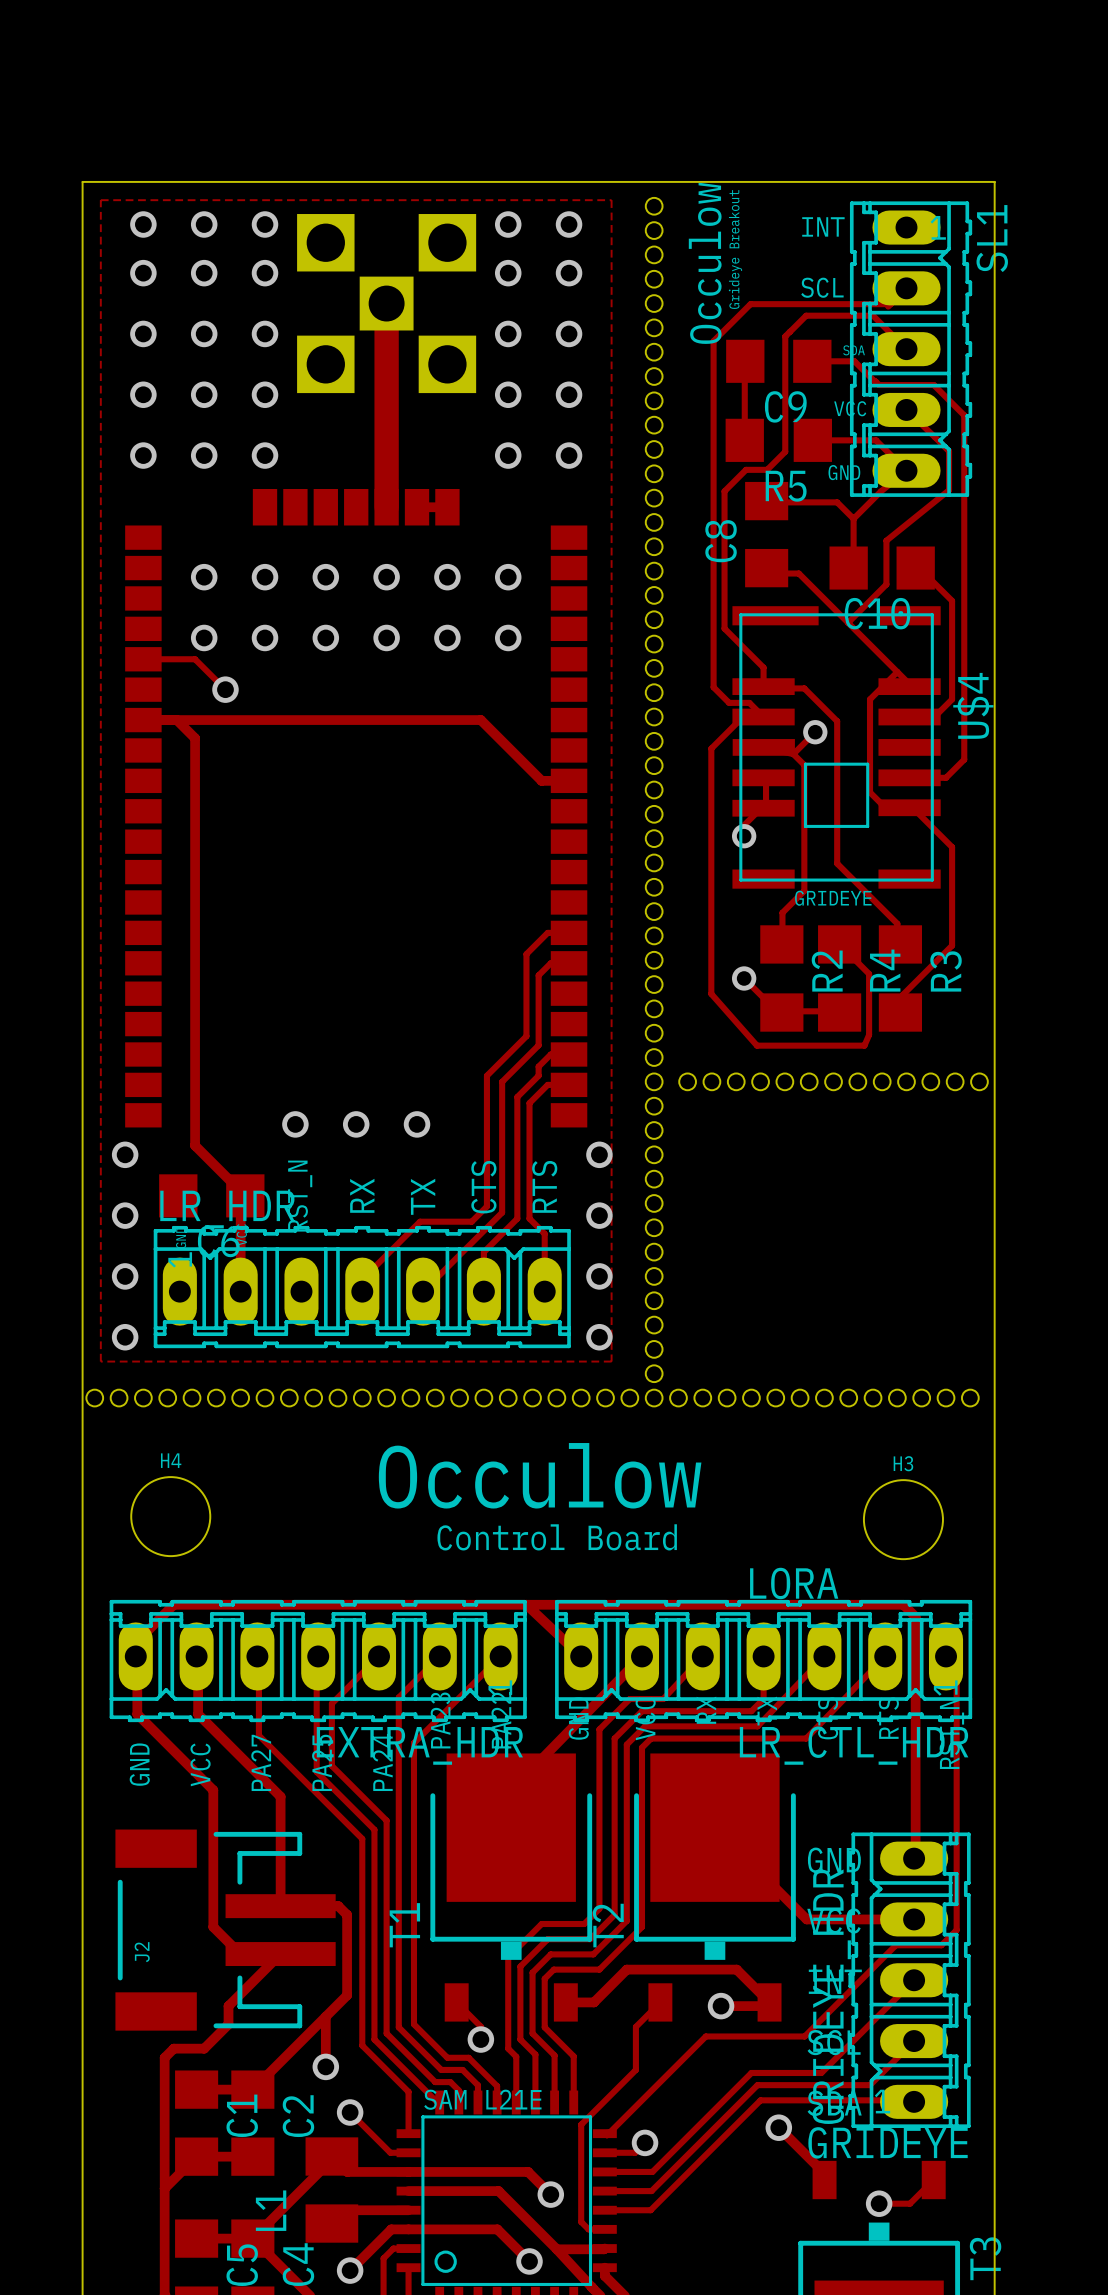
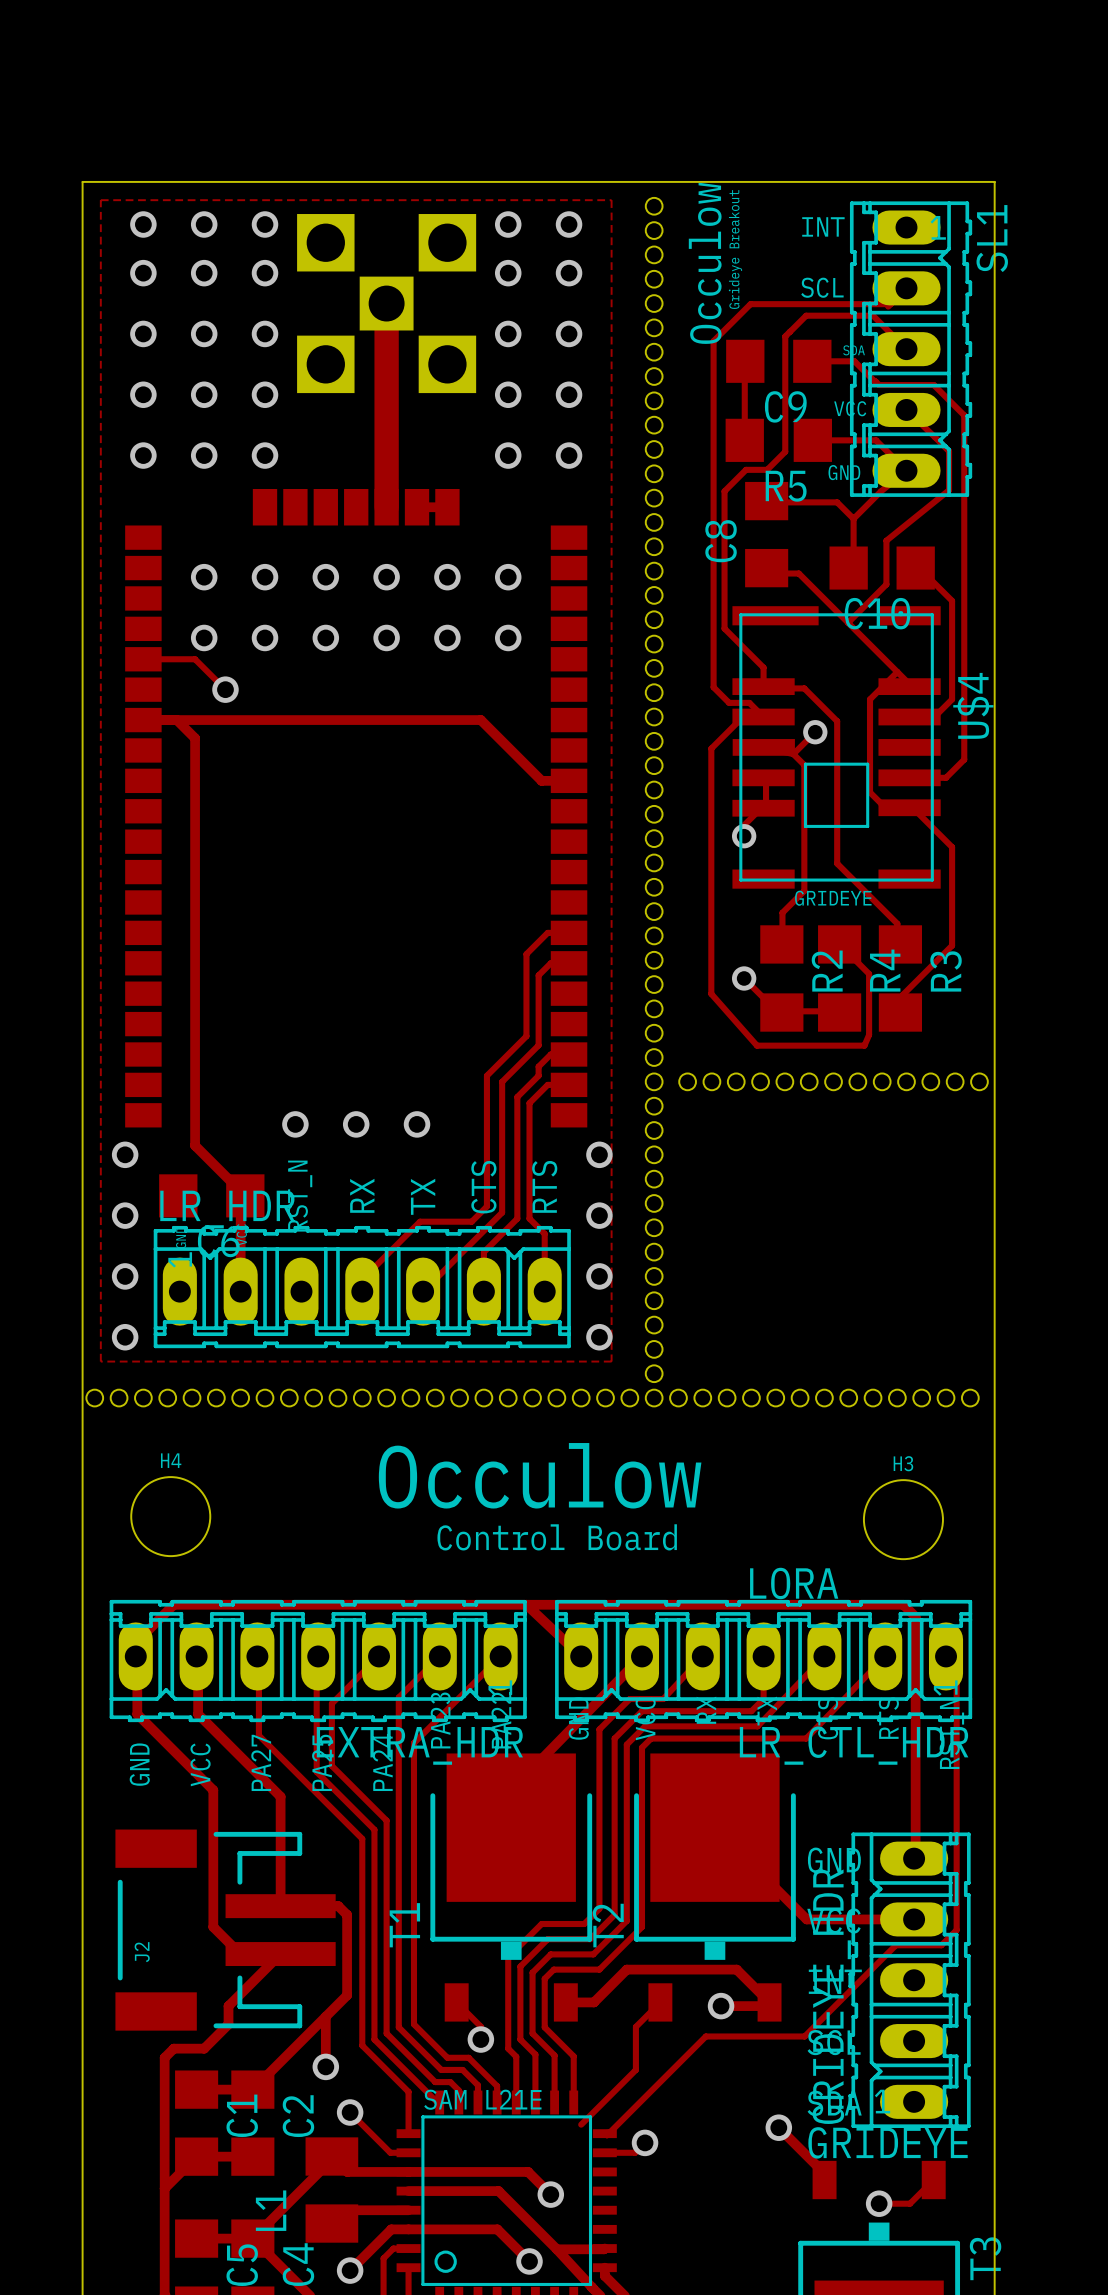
track: (914, 1980) (821, 2072) (751, 2072) (652, 2171) (604, 2171) -> none
track: (914, 2041) (870, 2085) (757, 2085) (651, 2191) (604, 2191) -> none
track: (914, 2101) (912, 2100) (760, 2100) (650, 2210) (604, 2210) -> none
track: (581, 2124) (581, 2221) (588, 2229) (604, 2229) -> none

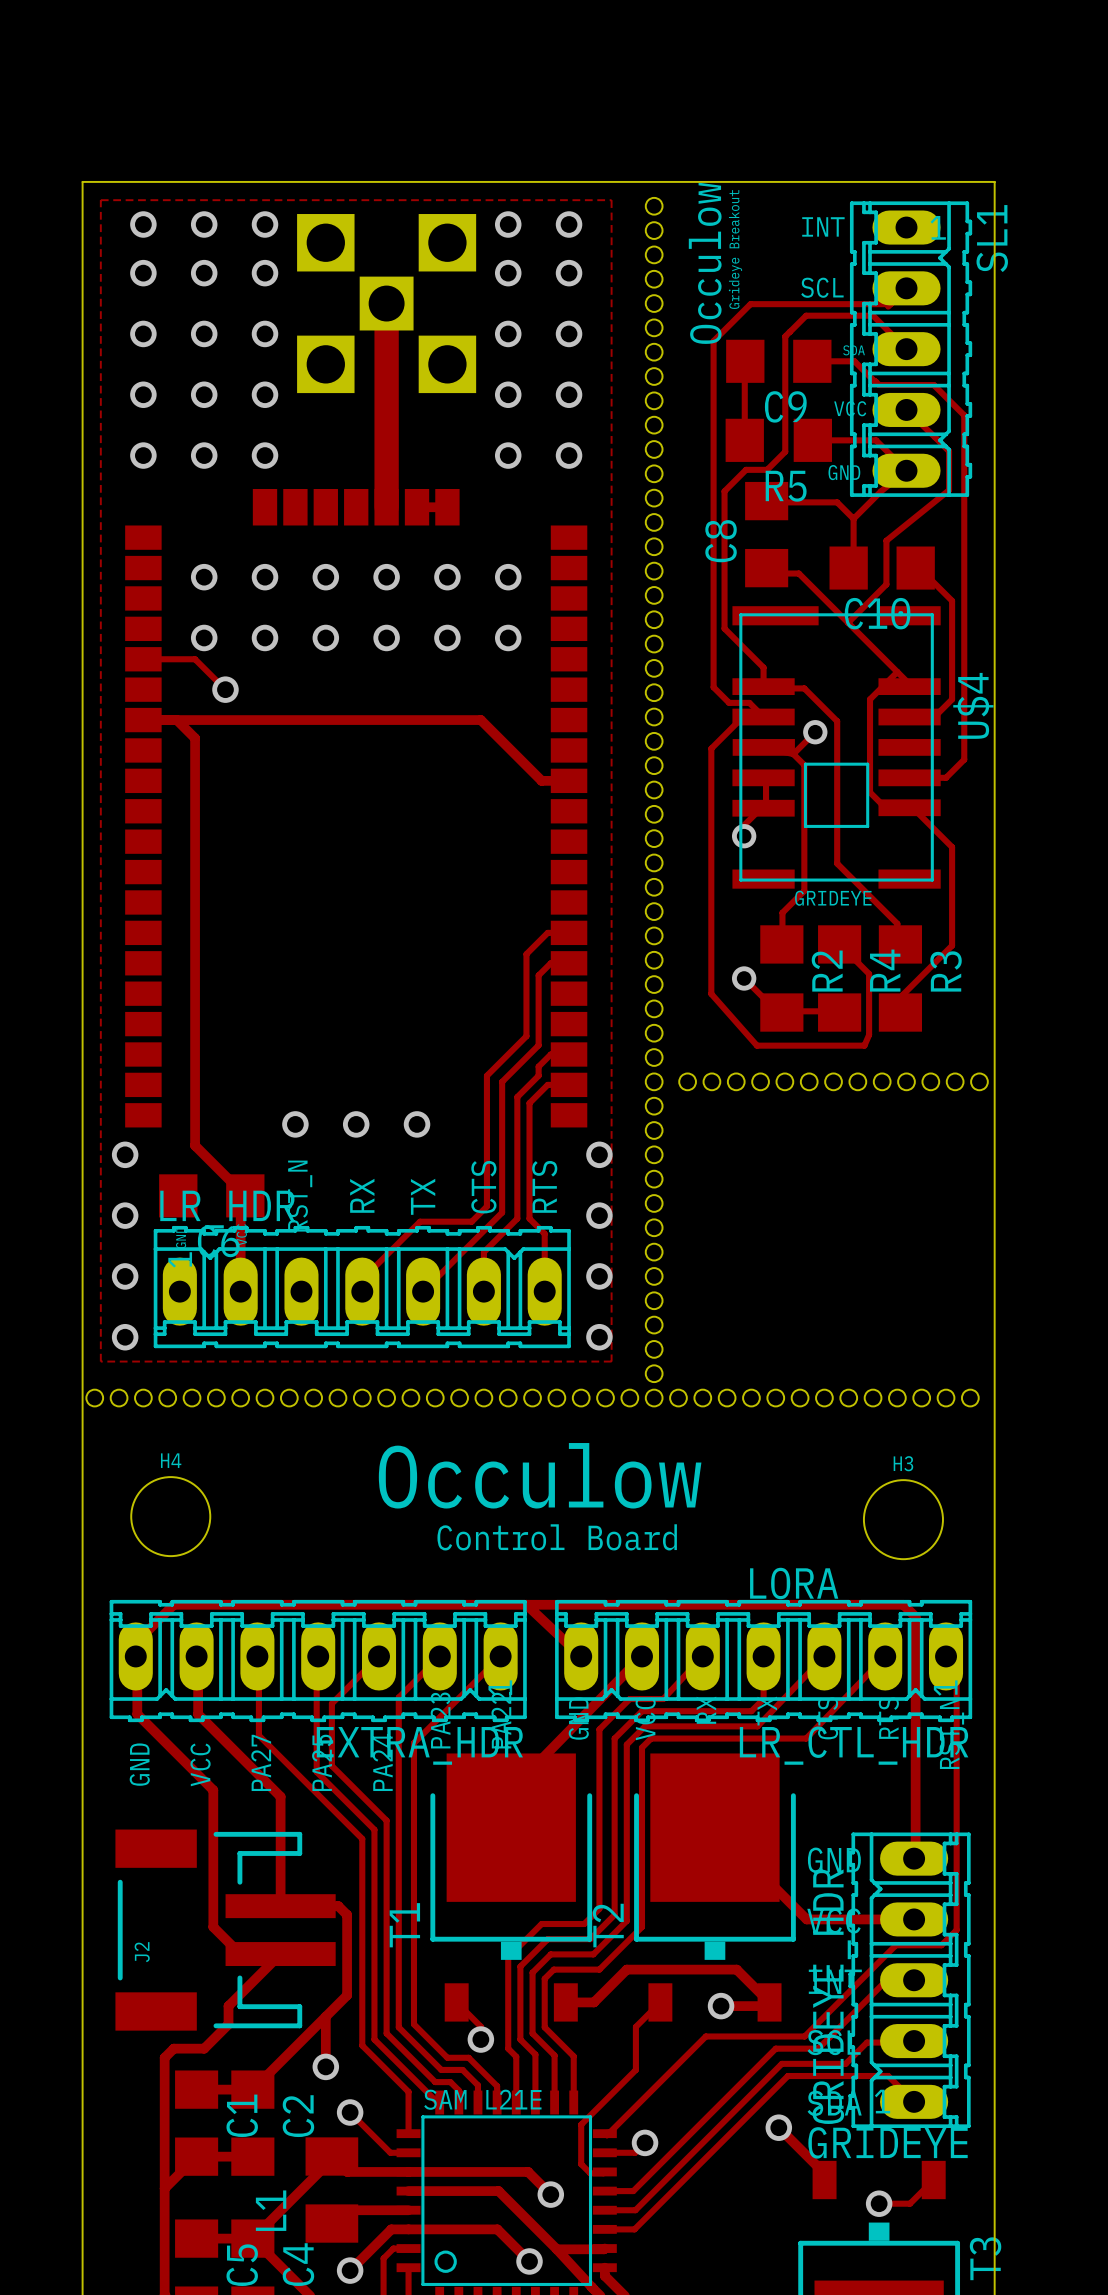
track: none -> (914, 1980) (885, 1981) (818, 2048) (775, 2048) (633, 2191) (604, 2191)
track: none -> (914, 2041) (866, 2042) (845, 2063) (781, 2063) (635, 2210) (604, 2210)
track: none -> (914, 2101) (888, 2076) (787, 2076) (634, 2229) (604, 2229)
track: none -> (581, 2124) (581, 2164) (590, 2173) (604, 2171)

